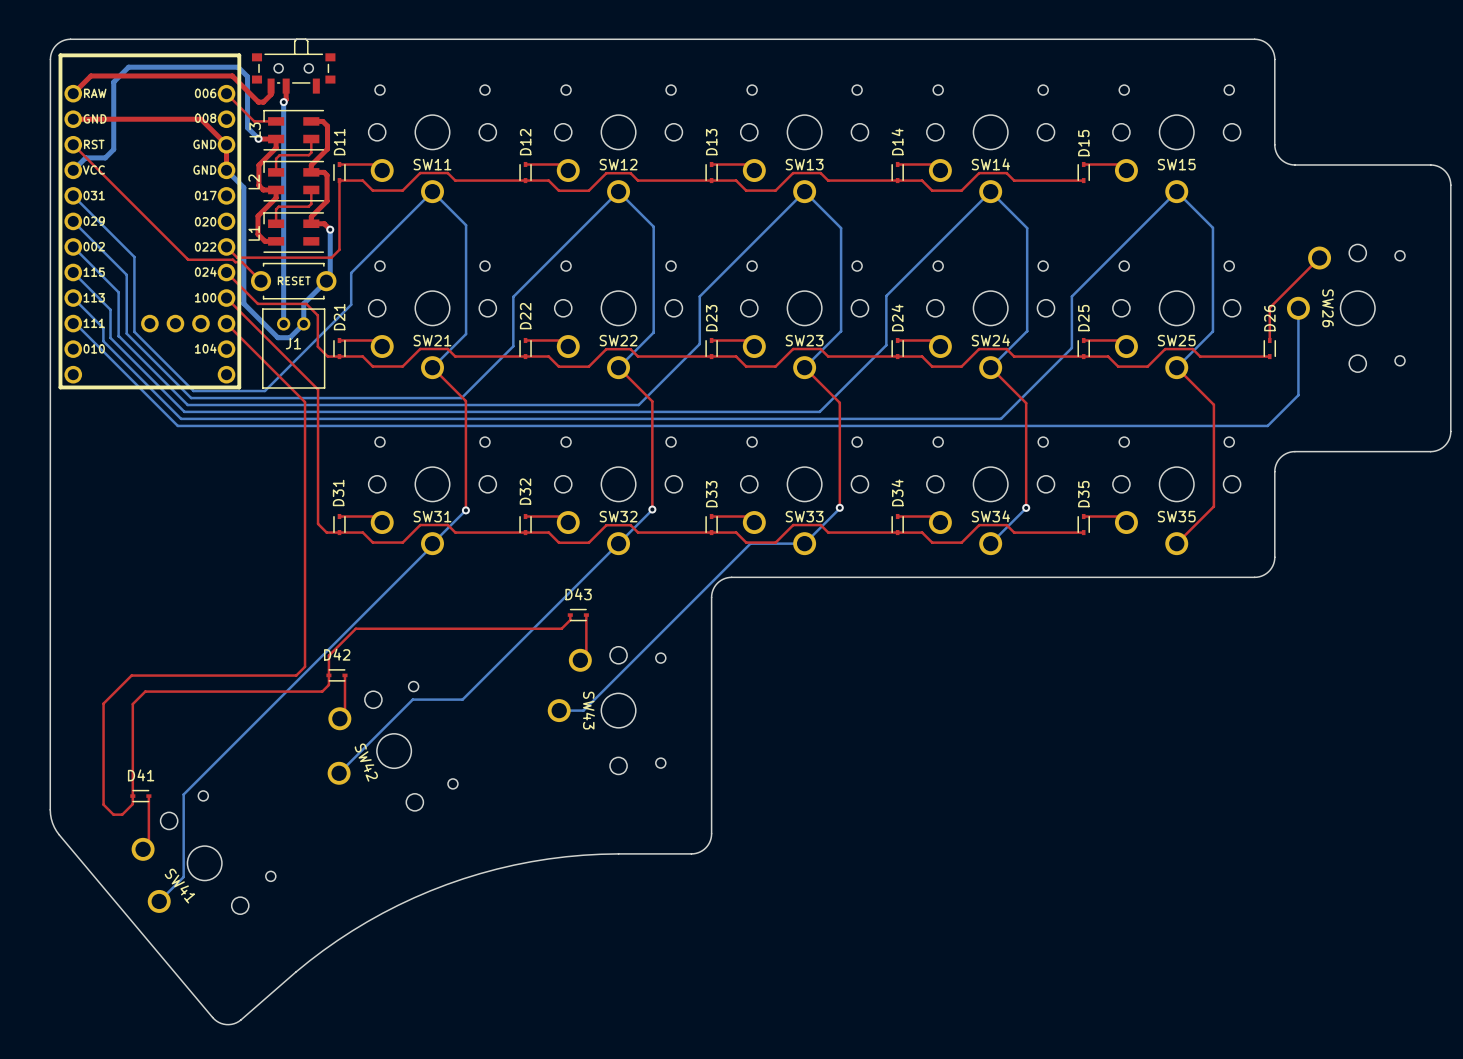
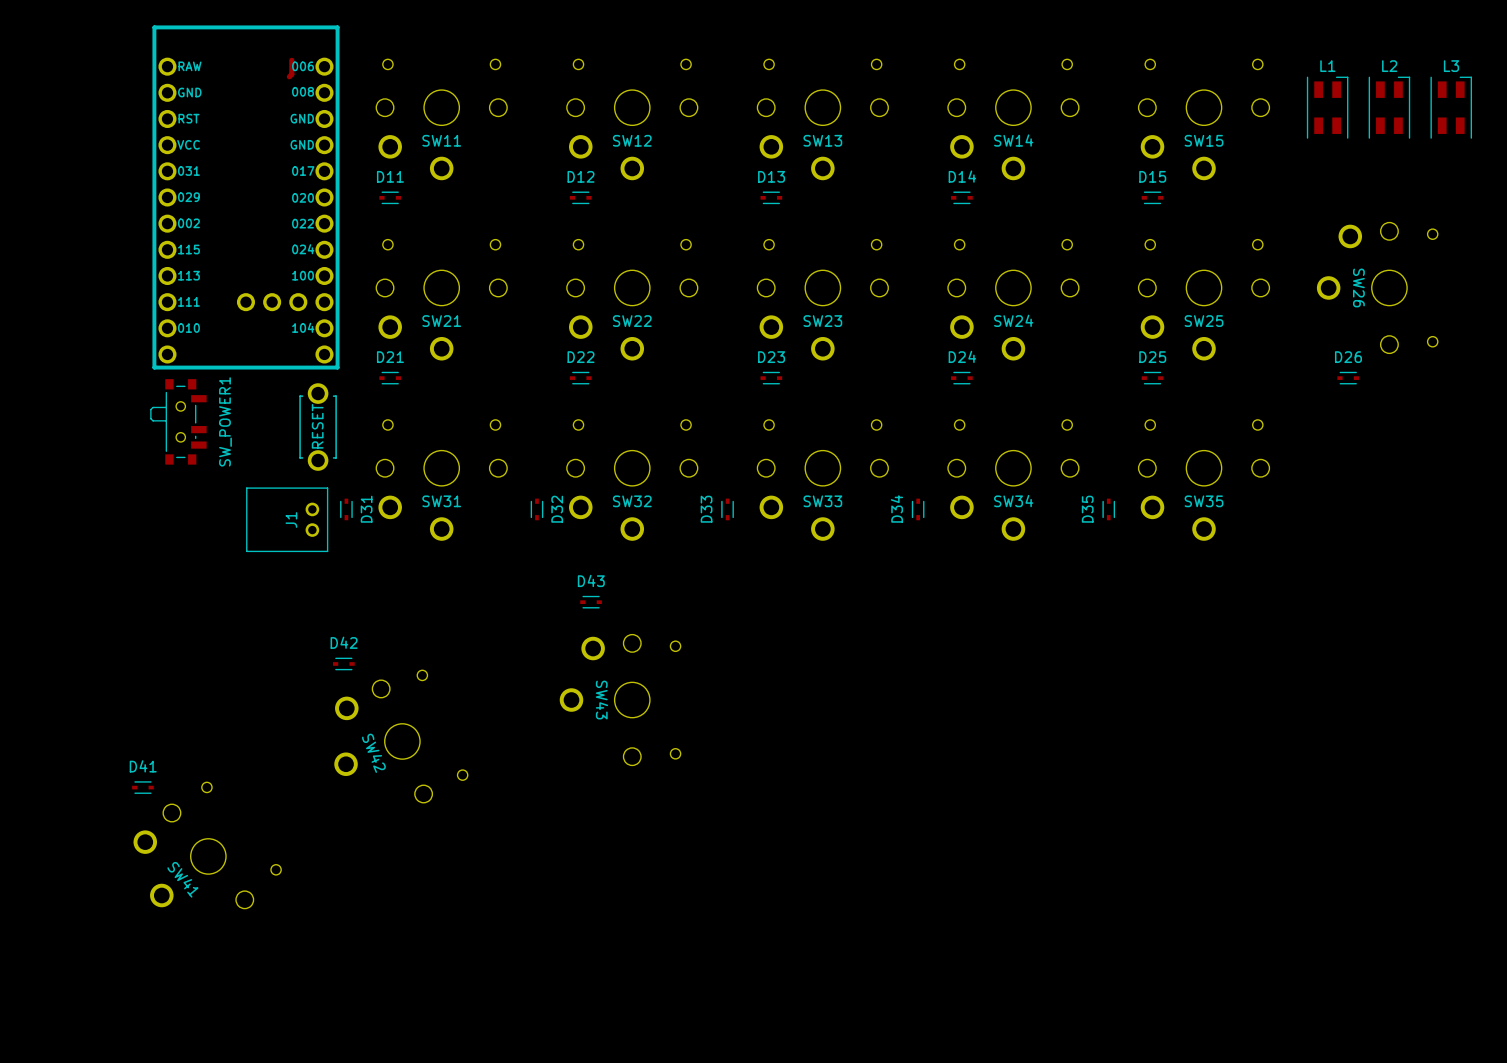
board edge: (70, 39) (1261, 40) (1270, 46) (1274, 54) (1274, 147) (1282, 160) (1294, 164) (1432, 165) (1441, 168) (1448, 176) (1450, 185) (1449, 438) (1443, 447) (1432, 451) (1294, 451) (1282, 456) (1274, 469) (1274, 561) (1268, 571) (1259, 576) (731, 577) (722, 579) (715, 584) (711, 595) (711, 833) (709, 842) (704, 849) (693, 853) (601, 854) (548, 858) (496, 869) (446, 884) (398, 905) (352, 930) (309, 961) (238, 1021) (231, 1024) (223, 1024) (212, 1017) (59, 835) (52, 823) (50, 814) (50, 59) (56, 45) (70, 39) -> none
part: (293, 66) -> none
top track: (271, 86) (271, 94) (263, 102) (258, 102) (232, 75) (90, 75) (73, 93) -> none
top track: (226, 93) (254, 121) (276, 121) -> none
bottom track: (283, 102) (283, 323) -> none
via: (283, 102) -> none
top track: (73, 119) (200, 119) (226, 144) (226, 170) -> none
top track: (311, 121) (322, 121) (327, 126) (327, 148) (311, 165) (311, 172) (324, 172) (327, 175) (327, 201) (311, 216) (311, 223) (324, 223) (330, 229) -> none
L3 rotation: 0° (293, 130) -> 90° clockwise (1451, 107)
L3 position: (293, 130) -> (1451, 107)
top track: (258, 138) (276, 139) (276, 147) (258, 165) (258, 185) (263, 189) (276, 189) (276, 197) (258, 216) (258, 234) (265, 241) (276, 241) -> none
bottom track: (258, 138) (247, 127) (247, 76) (238, 67) (128, 67) (113, 82) (113, 149) (105, 157) (85, 157) (73, 170) -> none
via: (258, 138) -> none
top track: (311, 139) (311, 152) (308, 155) (279, 155) (276, 158) (276, 172) -> none
top track: (73, 144) (187, 259) -> none
top track: (339, 164) (376, 164) (382, 170) -> none
top track: (525, 164) (562, 164) (568, 170) -> none
top track: (711, 164) (748, 164) (754, 170) -> none
top track: (897, 164) (934, 164) (940, 170) -> none
top track: (1083, 164) (1120, 164) (1126, 170) -> none
bottom track: (226, 170) (243, 187) (243, 303) (277, 337) (289, 337) (303, 323) (303, 303) (330, 277) (330, 229) -> none
D11 rotation: 0° (339, 172) -> 90° clockwise (390, 197)
D11 position: (339, 172) -> (390, 197)
D12 rotation: 0° (525, 172) -> 90° clockwise (580, 197)
D12 position: (525, 172) -> (580, 197)
D13 rotation: 0° (711, 172) -> 90° clockwise (771, 197)
D13 position: (711, 172) -> (771, 197)
D14 rotation: 0° (897, 172) -> 90° clockwise (961, 197)
D14 position: (897, 172) -> (961, 197)
D15 rotation: 0° (1083, 172) -> 90° clockwise (1152, 197)
D15 position: (1083, 172) -> (1152, 197)
top track: (828, 180) (820, 173) (793, 173) (775, 190) (746, 190) (736, 180) (637, 180) (630, 173) (606, 173) (588, 190) (558, 190) (548, 180) (455, 180) (447, 173) (420, 173) (402, 190) (372, 190) (362, 180) (339, 180) (339, 249) (331, 257) (237, 257) (226, 246) -> none
top track: (828, 180) (922, 180) (932, 190) (961, 190) (979, 173) (1006, 173) (1014, 180) -> none
top track: (1014, 180) (1083, 180) -> none
L2 rotation: 0° (293, 181) -> 90° clockwise (1389, 107)
L2 position: (293, 181) -> (1389, 107)
top track: (311, 189) (311, 204) (308, 206) (278, 206) (276, 209) (276, 223) -> none
bottom track: (73, 195) (134, 257) (134, 331) (193, 391) (264, 391) (351, 304) (351, 272) (432, 191) (466, 225) (466, 334) (432, 367) -> none
bottom track: (73, 221) (126, 274) (126, 333) (191, 398) (461, 398) (513, 346) (513, 296) (618, 191) (653, 226) (653, 332) -> none
part position: (149, 221) -> (245, 197)
via: (330, 229) -> none
L1 rotation: 0° (293, 232) -> 90° clockwise (1327, 107)
L1 position: (293, 232) -> (1327, 107)
bottom track: (73, 246) (118, 292) (118, 336) (187, 405) (638, 405) (699, 344) (699, 296) (804, 191) (841, 228) (841, 331) -> none
top track: (1319, 258) (1269, 307) (1269, 340) -> none
top track: (187, 259) (232, 259) (235, 262) (242, 262) (261, 281) -> none
bottom track: (73, 272) (110, 309) (110, 337) (184, 411) (819, 411) (886, 345) (886, 295) (990, 191) (1027, 228) (1027, 331) -> none
top track: (226, 272) (257, 303) (306, 303) (317, 315) (317, 346) (327, 356) (339, 356) -> none
part: (293, 281) -> none
bottom track: (73, 298) (103, 328) (103, 341) (181, 418) (1001, 418) (1071, 348) (1071, 296) (1176, 191) (1212, 227) (1212, 331) (1176, 367) -> none
top track: (226, 298) (318, 389) (318, 523) (326, 532) (362, 532) (372, 542) (402, 542) (420, 525) (447, 525) (455, 532) (548, 532) (558, 542) (588, 542) (606, 525) (630, 525) (638, 532) (736, 532) (746, 542) (775, 542) (793, 525) (820, 525) (828, 532) -> none
bottom track: (1298, 308) (1298, 395) (1267, 425) (177, 425) (75, 323) (73, 323) -> none
top track: (226, 323) (305, 402) (305, 666) (296, 675) (131, 675) (103, 703) (103, 804) (113, 814) (122, 814) (132, 804) (132, 704) (145, 691) (322, 691) (328, 684) (328, 655) (355, 628) (561, 628) (570, 620) (570, 615) -> none
bottom track: (840, 331) (804, 367) -> none
bottom track: (1027, 331) (990, 367) -> none
bottom track: (653, 332) (618, 367) -> none
top track: (339, 340) (376, 340) (382, 346) -> none
top track: (525, 340) (562, 340) (568, 346) -> none
top track: (711, 340) (748, 340) (754, 346) -> none
top track: (897, 340) (934, 340) (940, 346) -> none
top track: (1083, 340) (1120, 340) (1126, 346) -> none
J1 rotation: 0° (293, 348) -> 90° clockwise (287, 519)
J1 position: (293, 348) -> (287, 519)
D21 rotation: 0° (339, 348) -> 90° clockwise (390, 378)
D21 position: (339, 348) -> (390, 378)
D22 rotation: 0° (525, 348) -> 90° clockwise (580, 378)
D22 position: (525, 348) -> (580, 378)
D23 rotation: 0° (711, 348) -> 90° clockwise (771, 378)
D23 position: (711, 348) -> (771, 378)
D24 rotation: 0° (897, 348) -> 90° clockwise (961, 378)
D24 position: (897, 348) -> (961, 378)
D25 rotation: 0° (1083, 348) -> 90° clockwise (1152, 378)
D25 position: (1083, 348) -> (1152, 378)
D26 rotation: 0° (1269, 348) -> 90° clockwise (1348, 378)
D26 position: (1269, 348) -> (1348, 378)
top track: (339, 356) (362, 356) (372, 366) (402, 366) (420, 348) (447, 348) (455, 356) (548, 356) (558, 366) (588, 366) (606, 349) (630, 349) (637, 356) (736, 356) (746, 366) (775, 366) (793, 349) (820, 349) (828, 356) -> none
top track: (828, 356) (897, 356) -> none
top track: (897, 356) (922, 356) (932, 366) (961, 366) (979, 349) (1006, 349) (1014, 356) (1108, 356) (1118, 366) (1147, 366) (1165, 349) (1192, 349) (1200, 356) (1269, 356) -> none
top track: (432, 367) (465, 401) (465, 510) -> none
top track: (618, 367) (652, 401) (652, 509) -> none
top track: (804, 367) (839, 402) (839, 507) -> none
top track: (990, 367) (1026, 403) (1026, 507) -> none
top track: (1176, 367) (1213, 404) (1213, 506) (1176, 543) -> none
SW_POWER1: none -> (178, 421)
part: none -> (318, 427)
D32 name position: D32 (525, 491) -> D32 (557, 509)
D31 name position: D31 (338, 492) -> D31 (366, 509)
D34 name position: D34 (897, 492) -> D34 (896, 508)
D33 name position: D33 (711, 494) -> D33 (706, 509)
D35 name position: D35 (1083, 494) -> D35 (1087, 509)
bottom track: (839, 507) (804, 543) (750, 543) (583, 710) (559, 710) -> none
via: (839, 507) -> none
bottom track: (1026, 507) (990, 543) -> none
via: (1026, 507) -> none
bottom track: (652, 509) (462, 699) (412, 699) (339, 773) -> none
via: (652, 509) -> none
bottom track: (465, 510) (183, 794) (183, 877) (159, 901) -> none
via: (465, 510) -> none
top track: (339, 516) (376, 516) (382, 522) -> none
top track: (525, 516) (562, 516) (568, 522) -> none
top track: (711, 516) (748, 516) (754, 522) -> none
top track: (897, 516) (934, 516) (940, 522) -> none
top track: (1083, 516) (1120, 516) (1126, 522) -> none
top track: (828, 532) (922, 532) (932, 542) (961, 542) (979, 525) (1006, 525) (1014, 532) -> none
top track: (1014, 532) (1083, 532) -> none
top track: (586, 615) (586, 654) (580, 660) -> none
top track: (344, 675) (344, 713) (339, 718) -> none
top track: (148, 796) (148, 843) (143, 849) -> none

